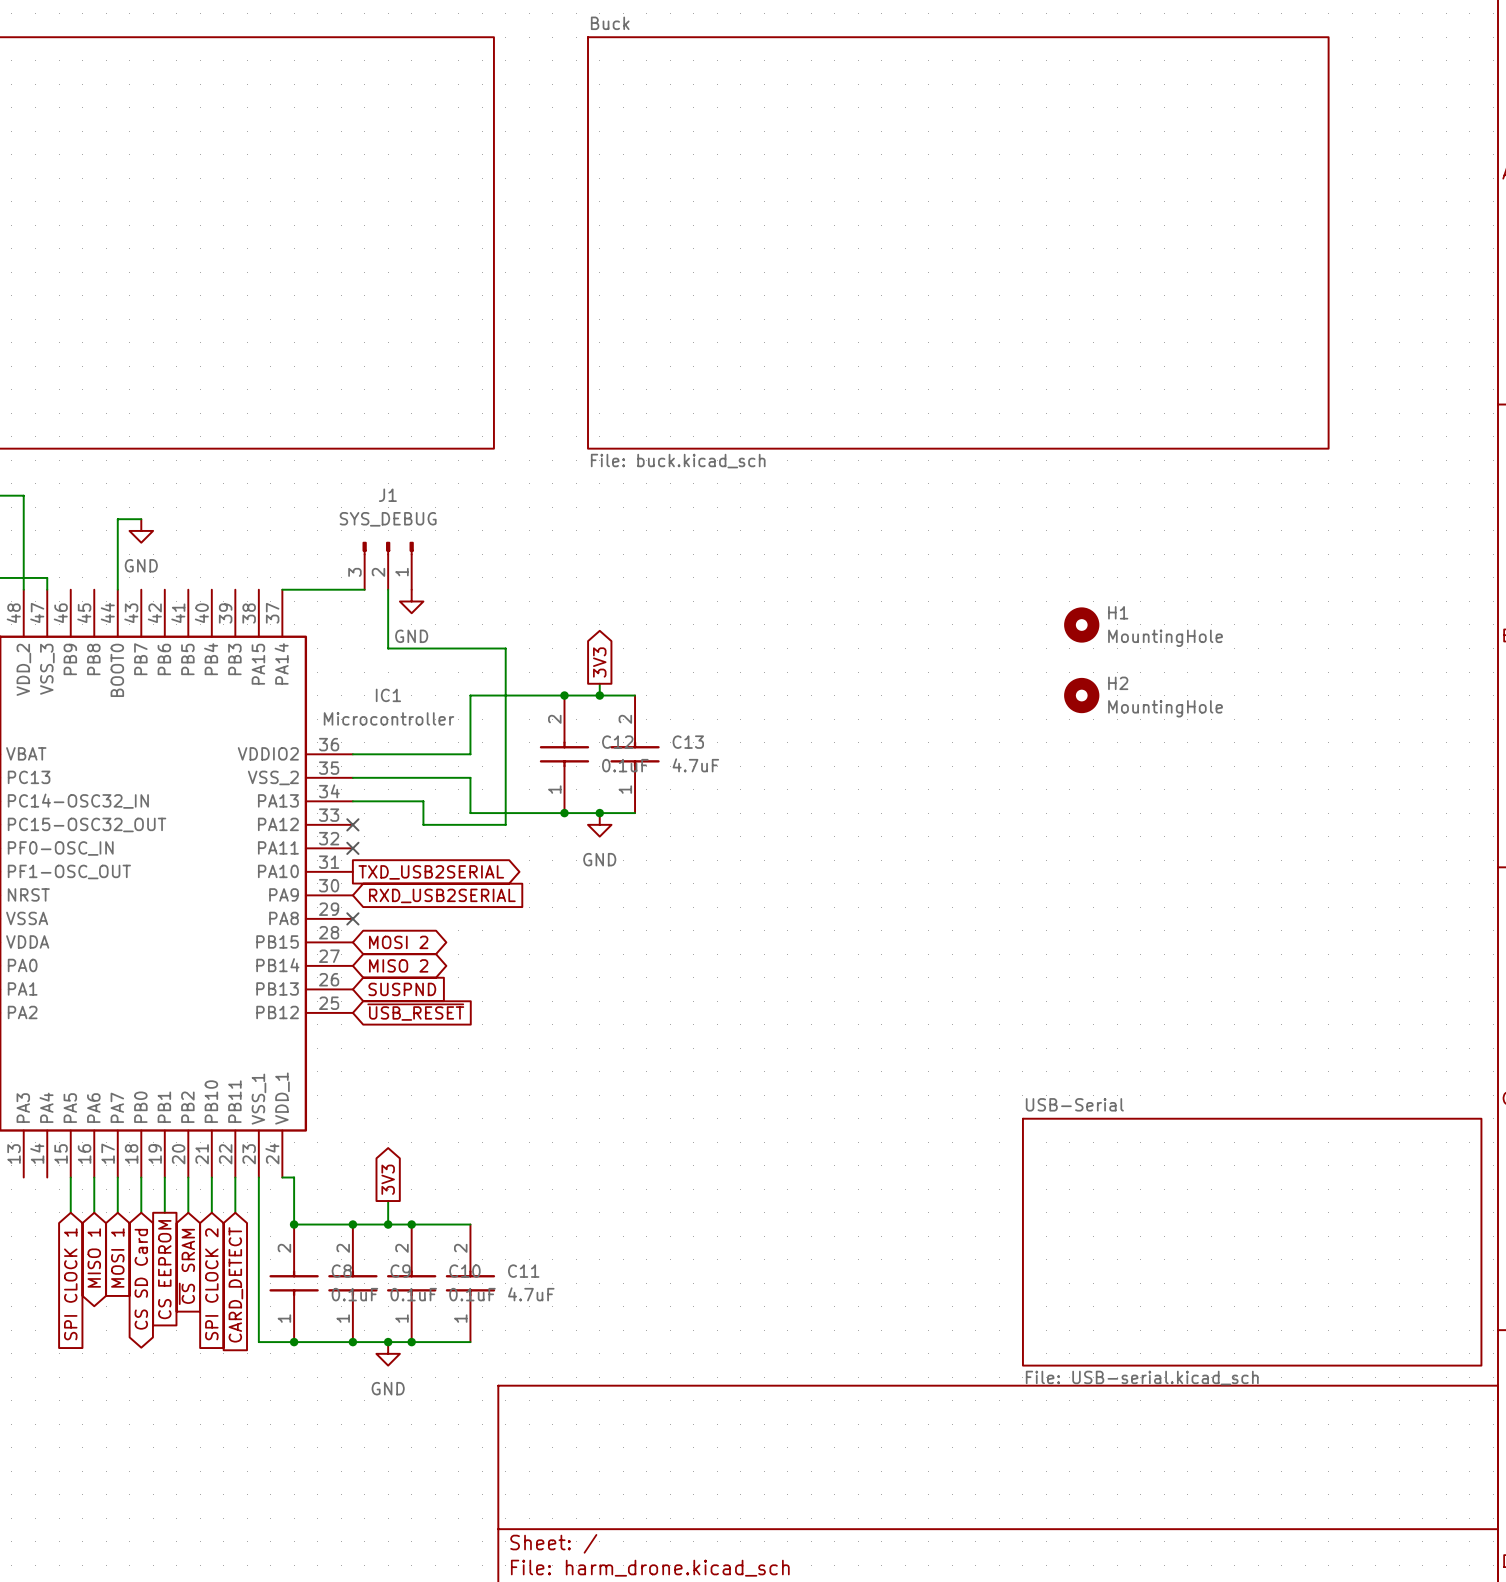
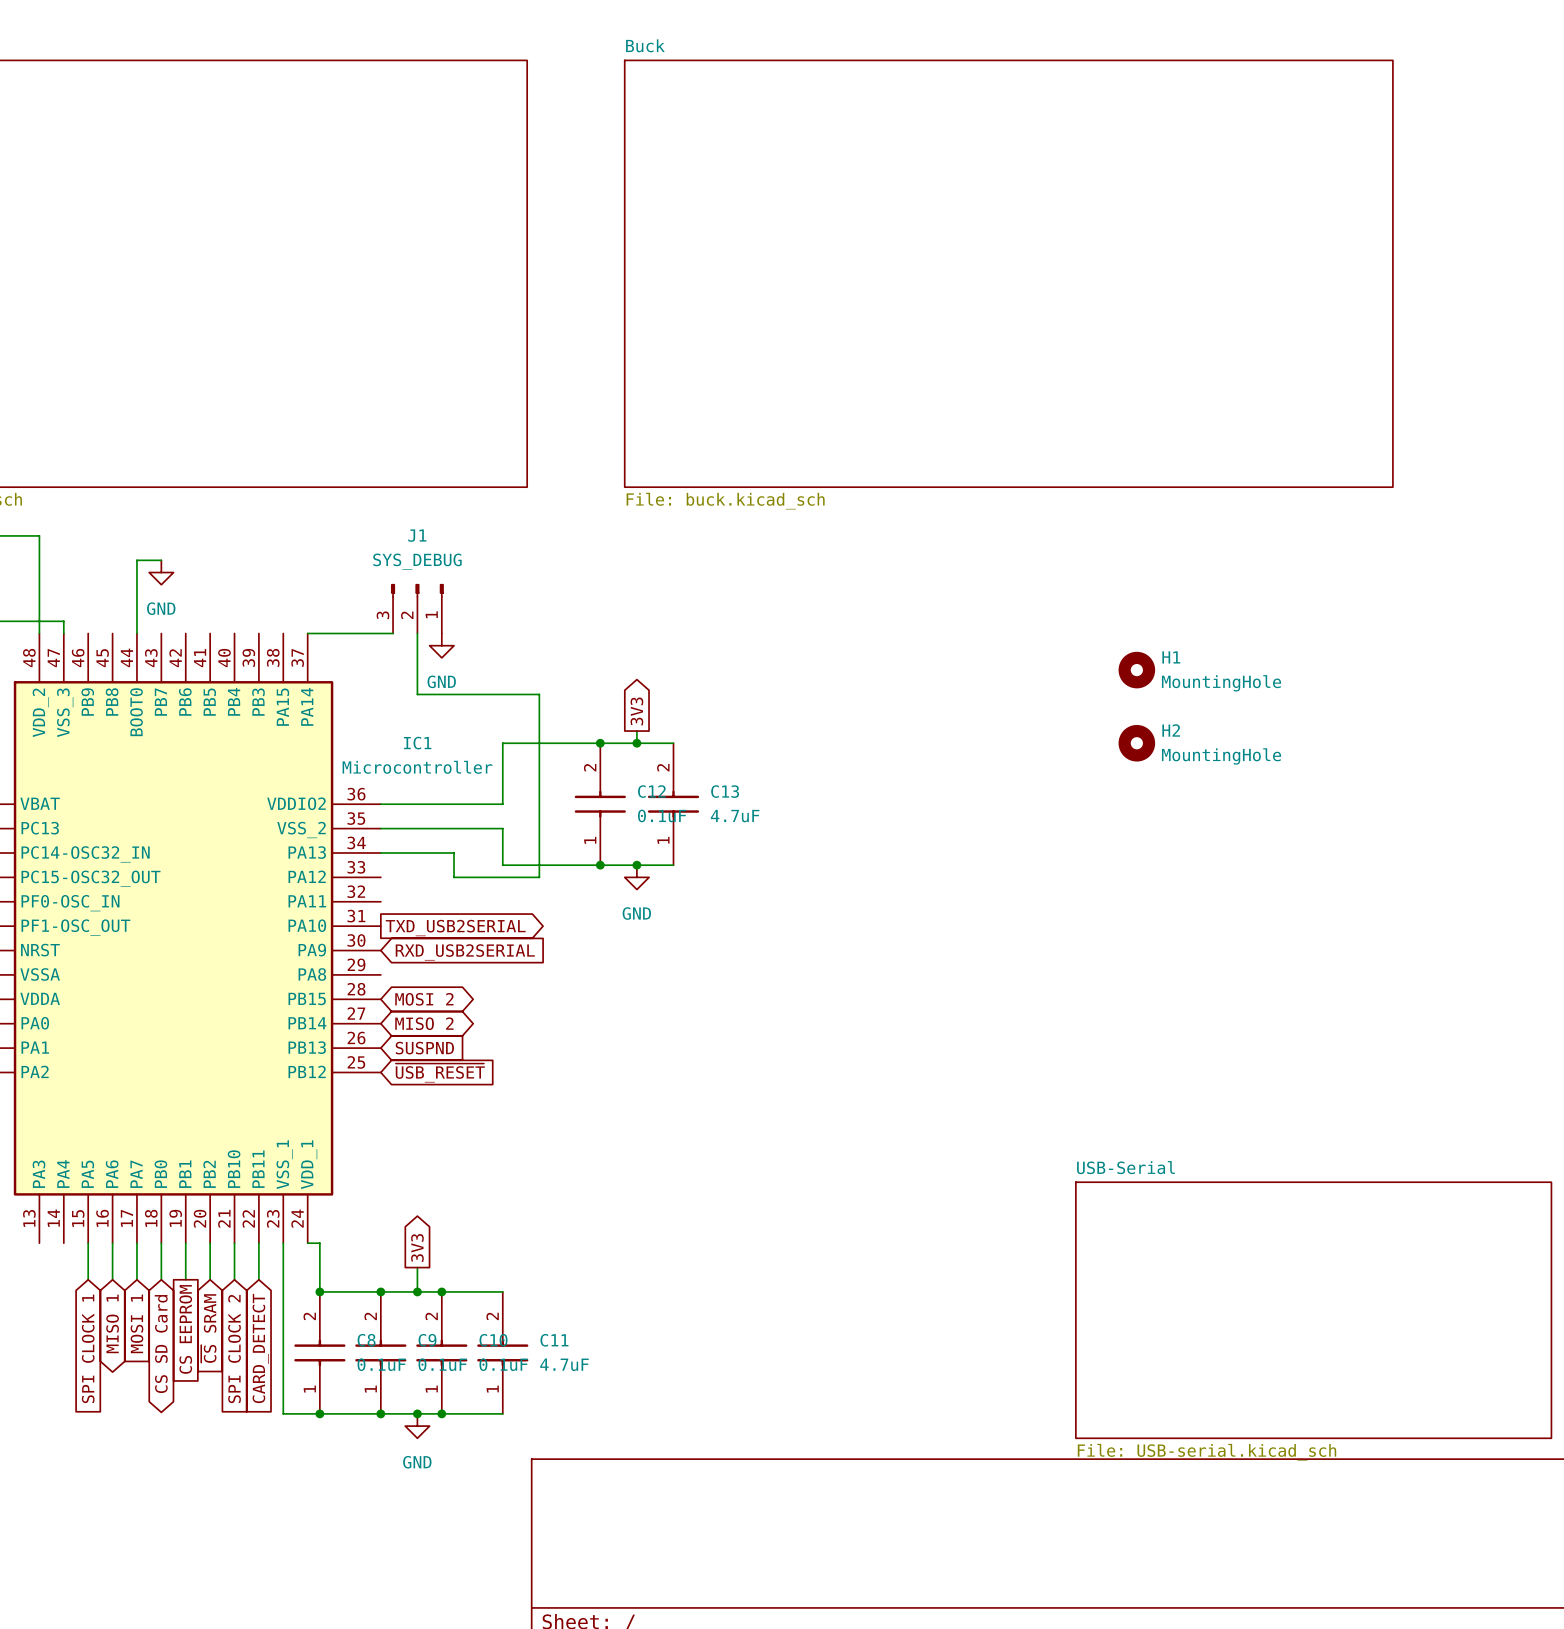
no-connect mark: (352, 824) -> none
no-connect mark: (352, 848) -> none
no-connect mark: (352, 918) -> none

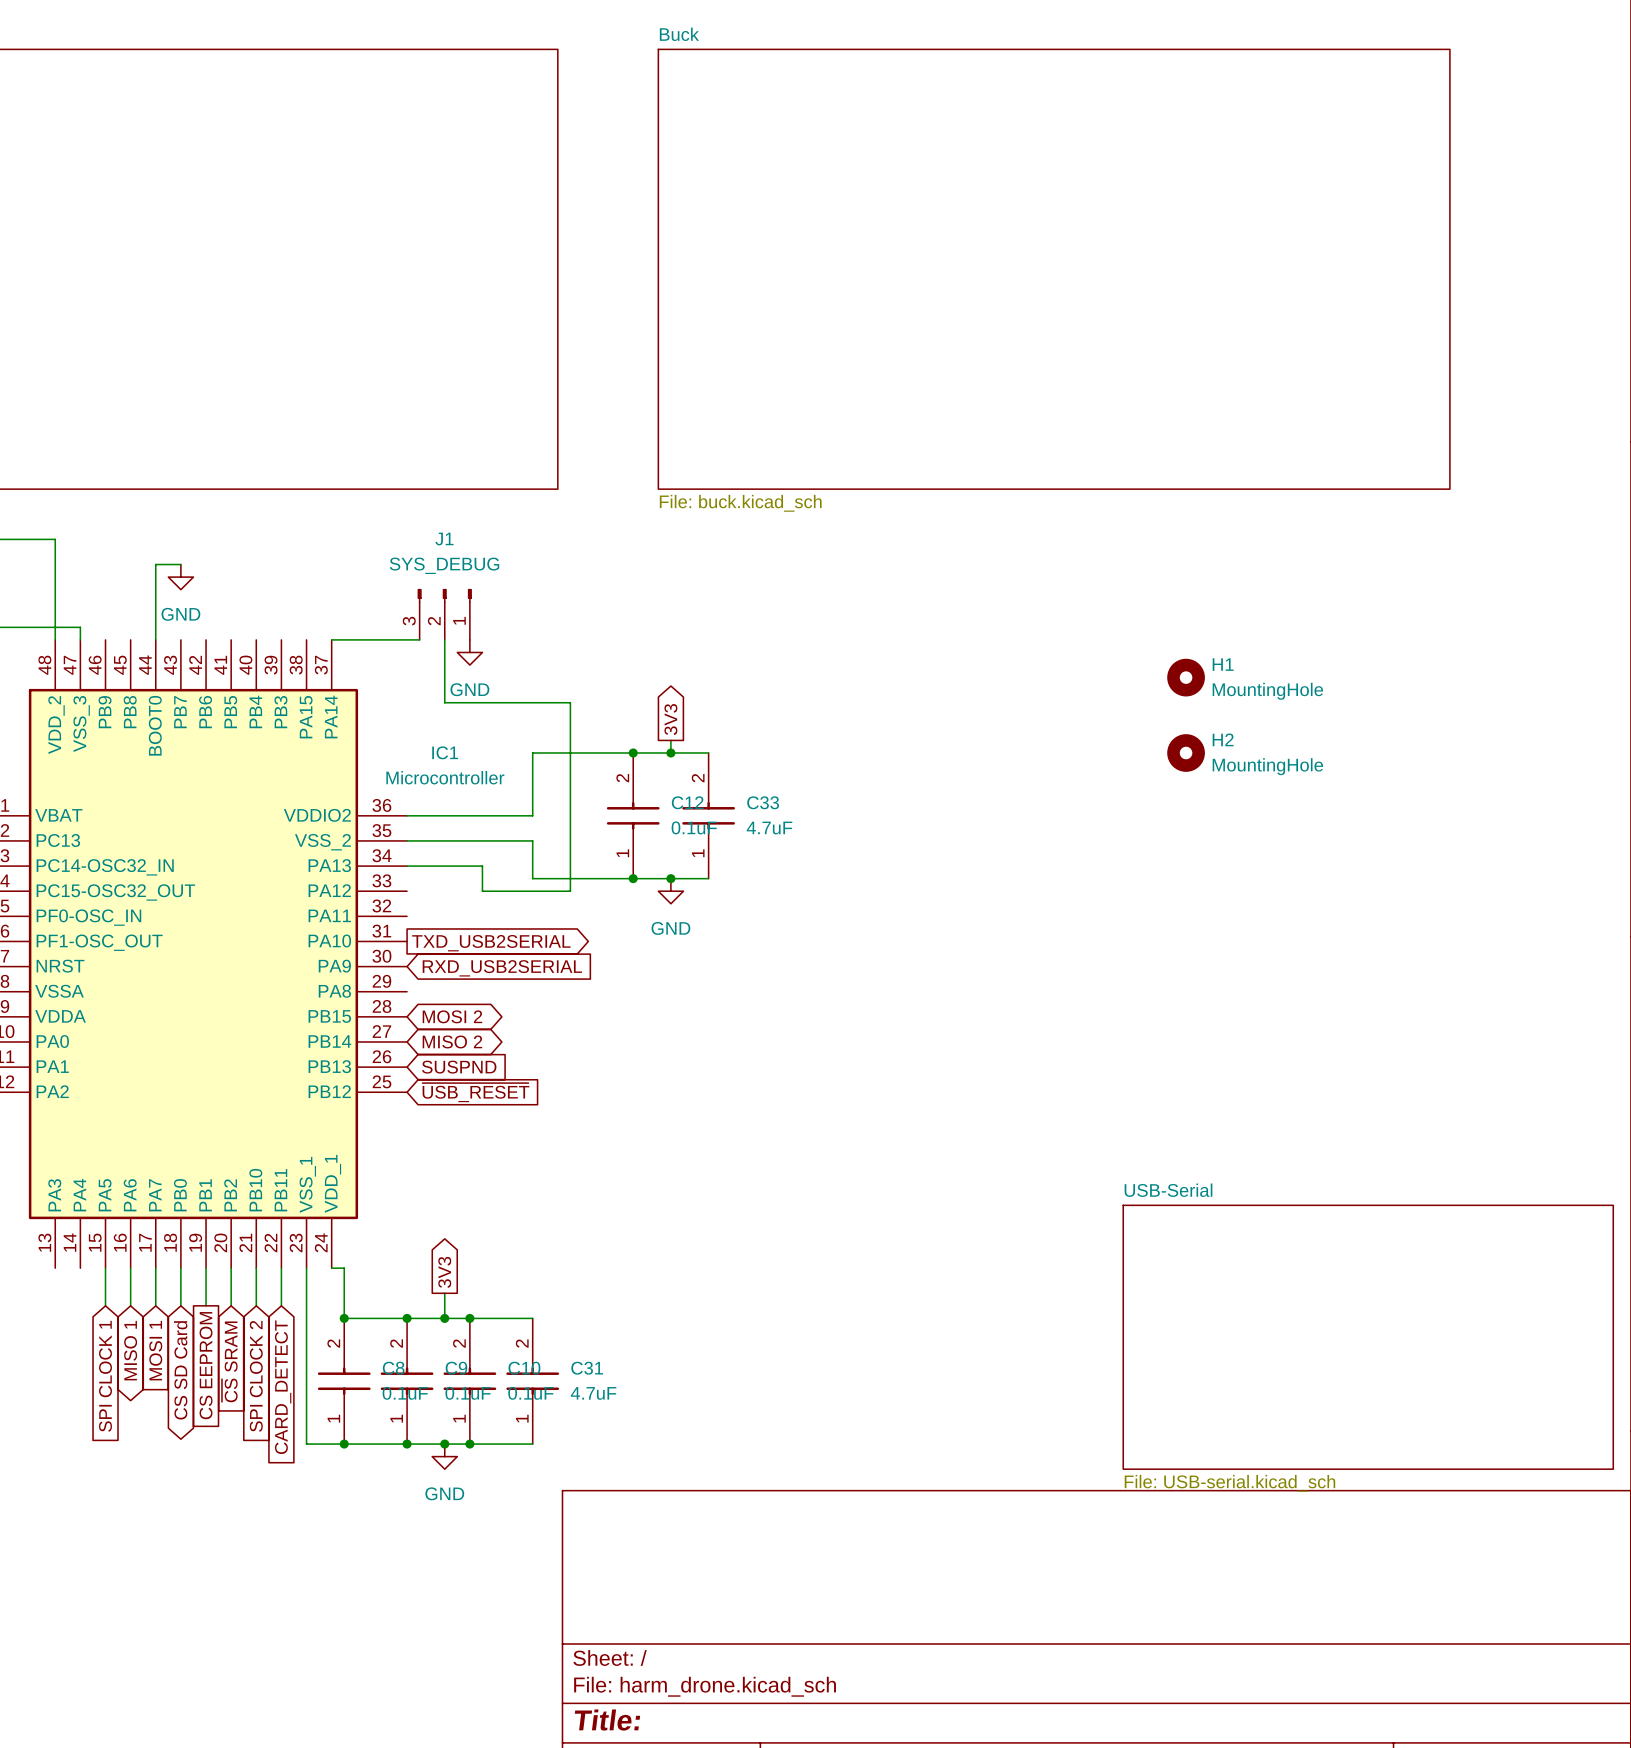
C13 name: C13 (725, 791) -> C33 (763, 802)
C11 name: C11 (554, 1340) -> C31 (587, 1368)

